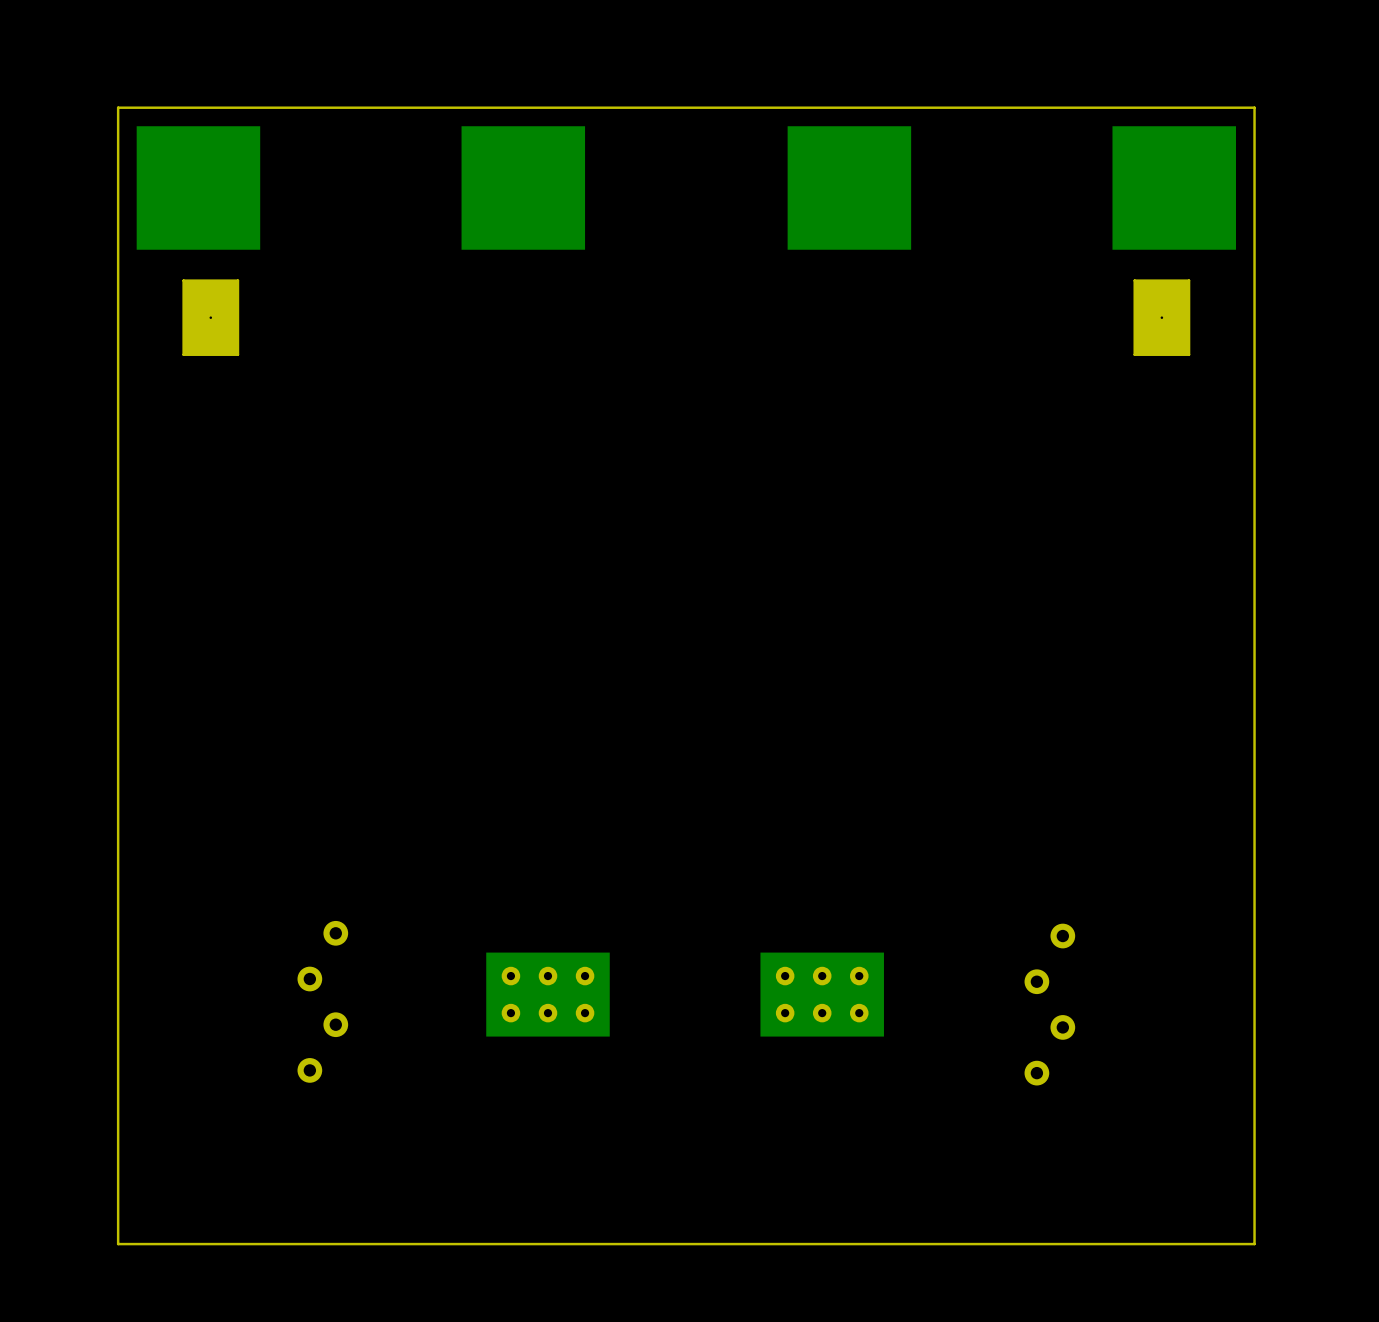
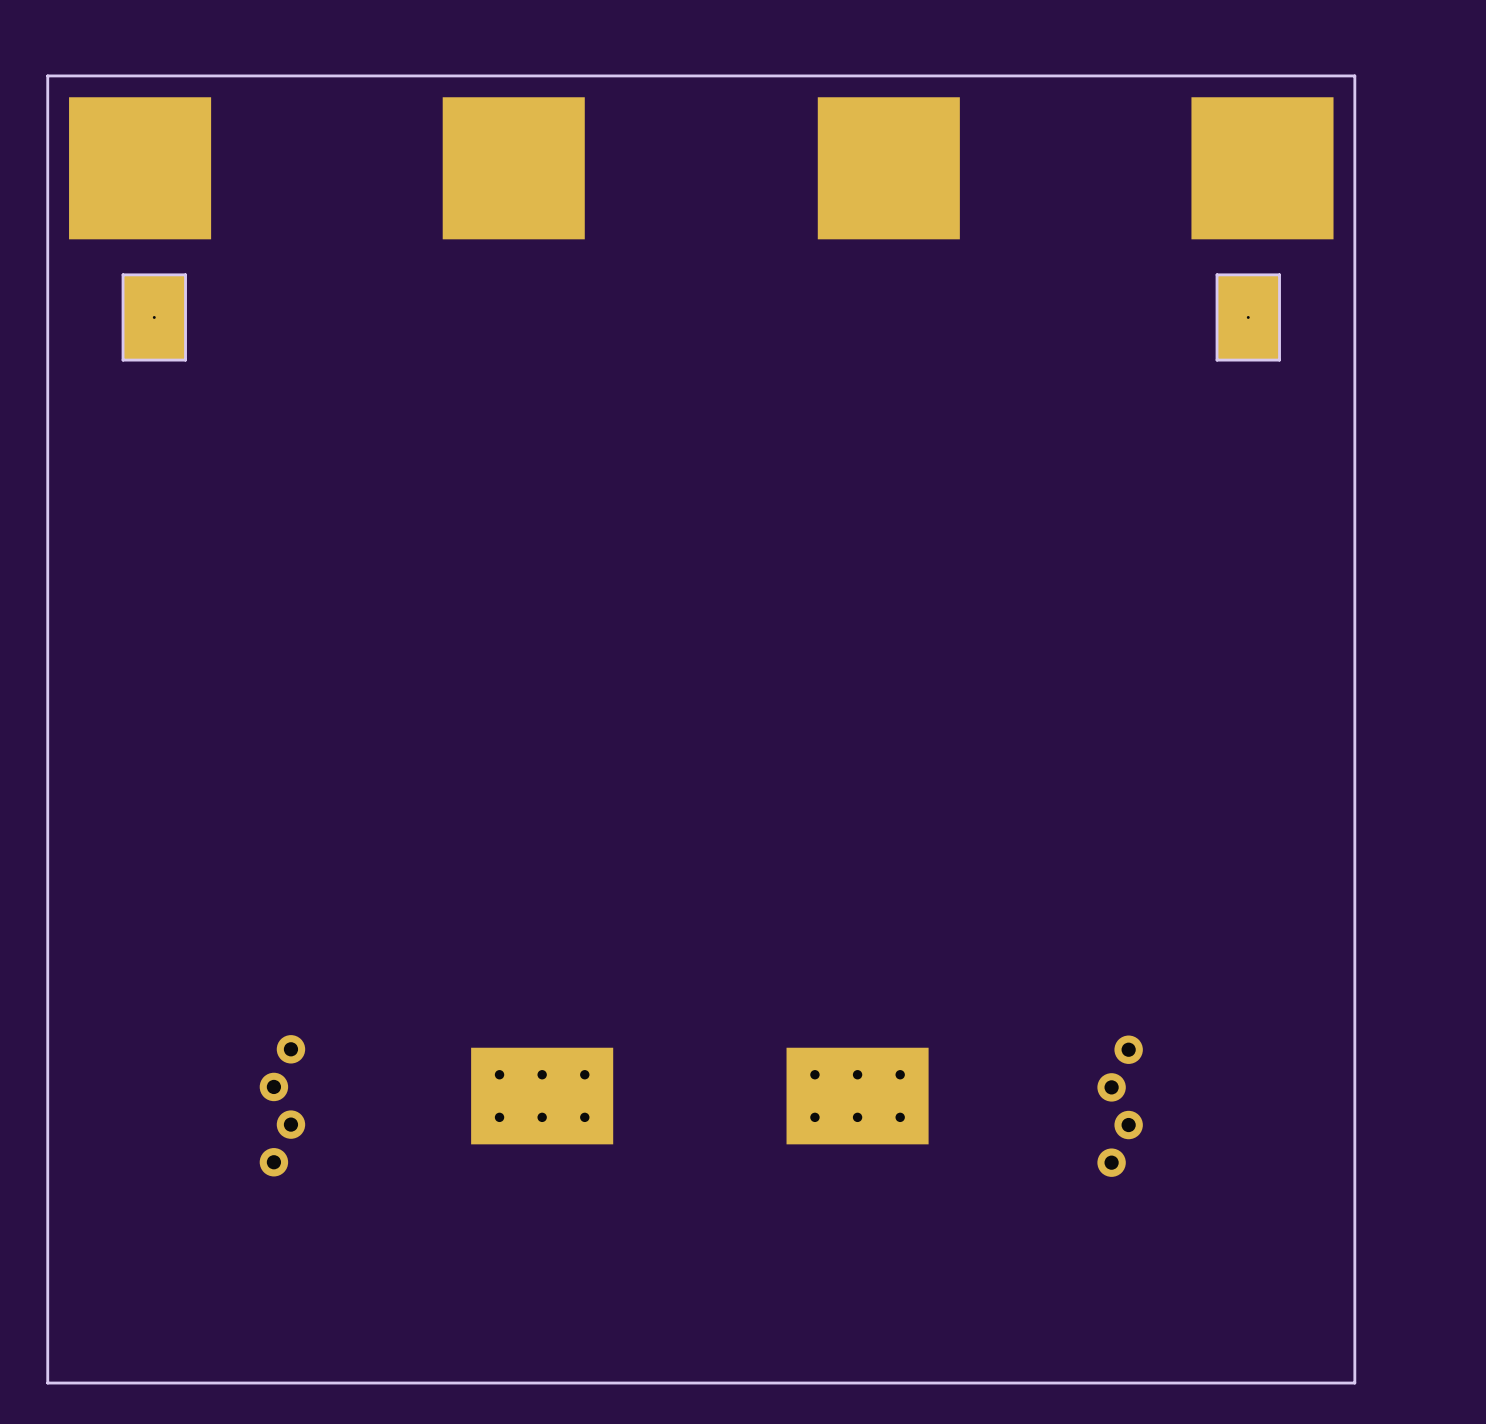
part footprint: [297, 920, 349, 1083] -> [259, 1035, 306, 1177]
part footprint: [1024, 923, 1076, 1086] -> [1097, 1035, 1143, 1177]

